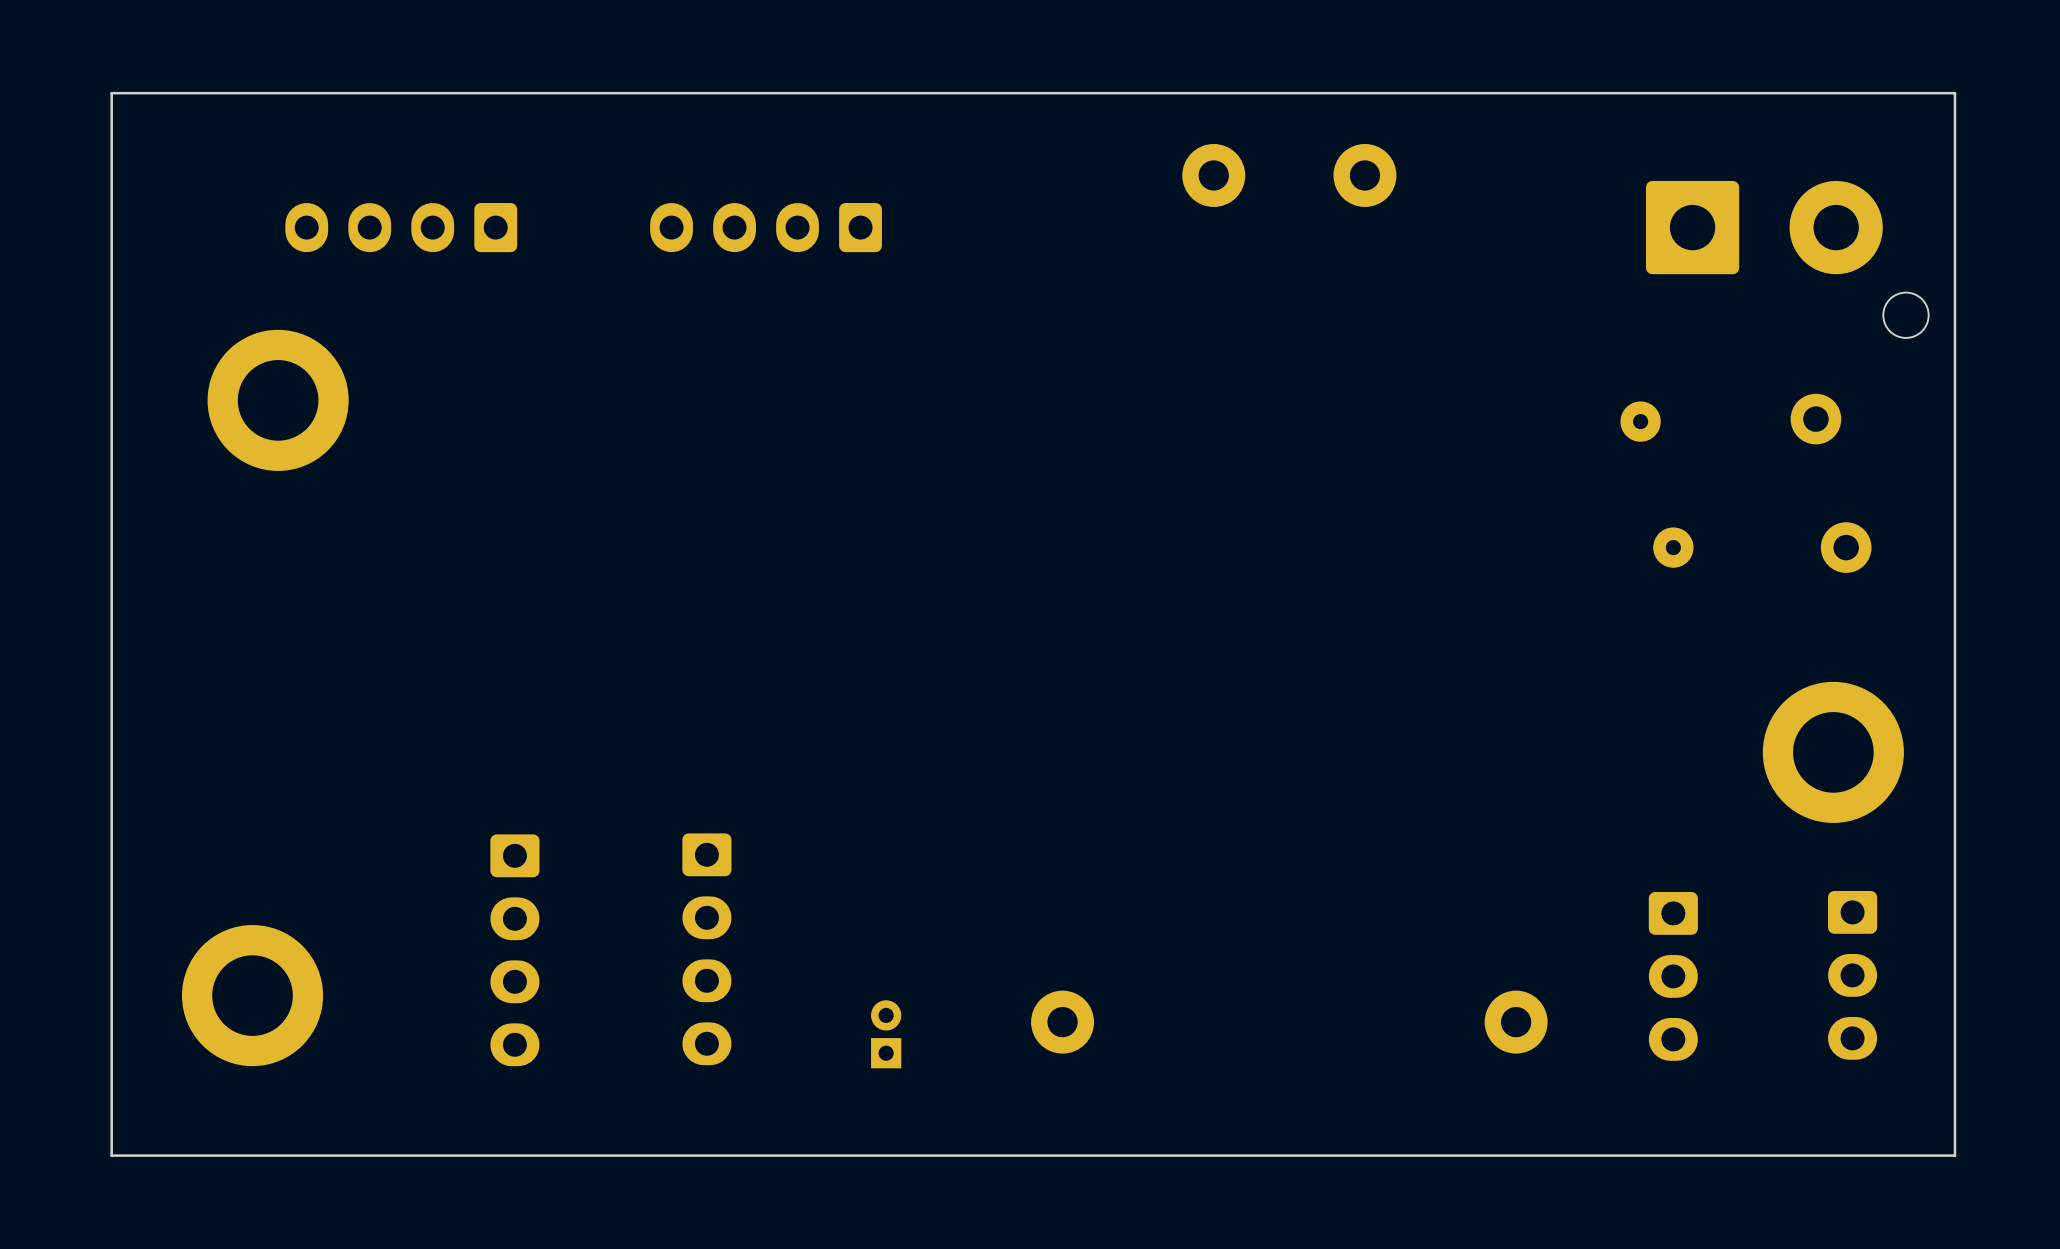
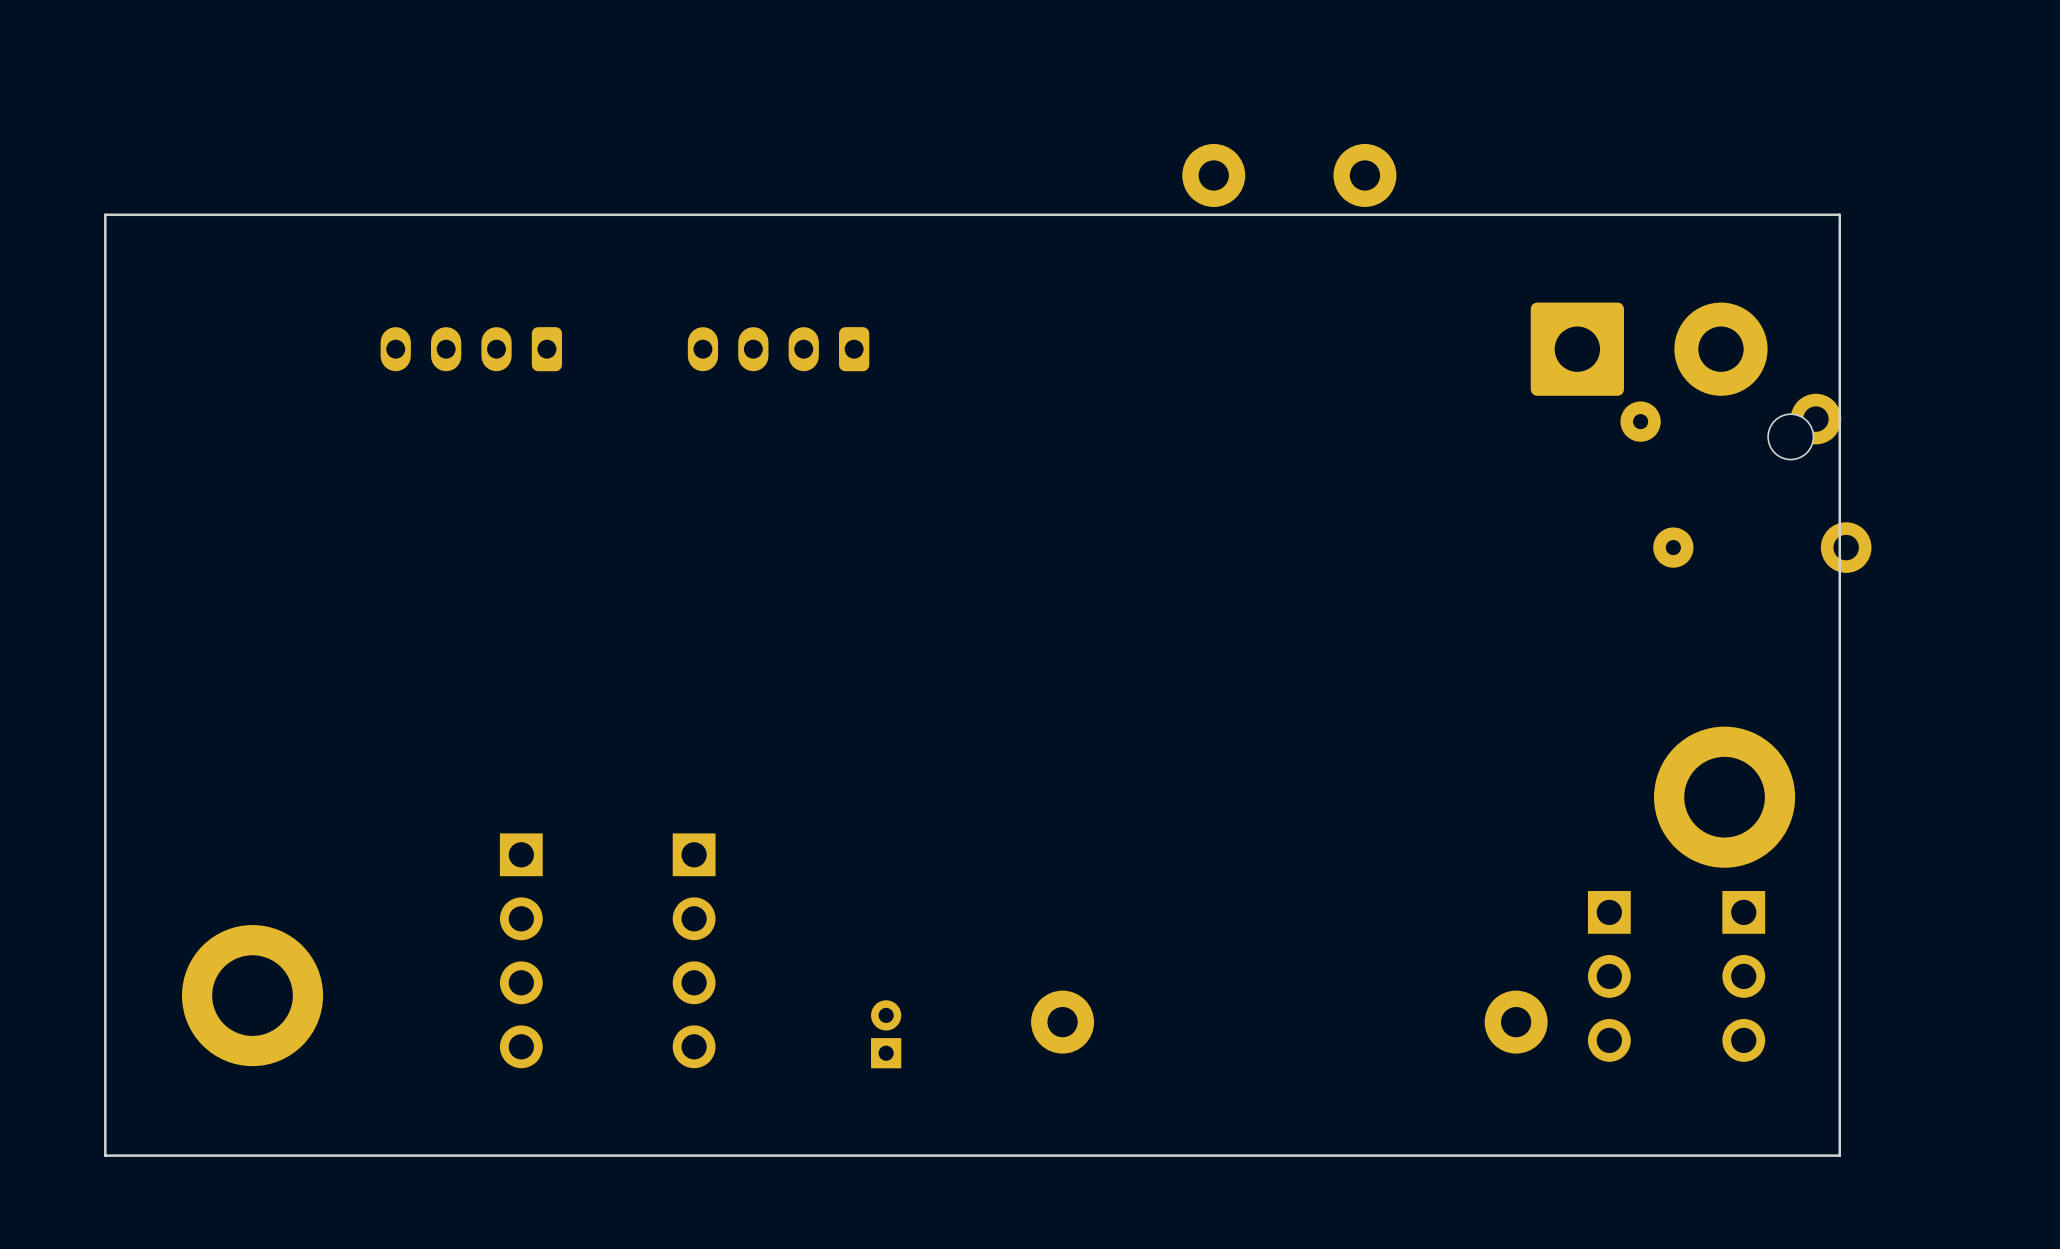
part: (401, 227) -> none
part: (766, 227) -> none
part position: (1787, 259) -> (1672, 381)
part: none -> (471, 349)
part: none -> (778, 349)
part: (278, 400) -> none
part position: (1833, 752) -> (1724, 797)
part footprint: [682, 833, 732, 1066] -> [672, 833, 716, 1069]
part footprint: [490, 834, 540, 1067] -> [499, 833, 543, 1069]
part: (1852, 975) -> none
part: none -> (1609, 976)
part: (1673, 976) -> none
part: none -> (1743, 976)
board edge: (1839, 1155) (1954, 1155) (1954, 93) (111, 93) (111, 1155) -> (1839, 1155) (1839, 214) (105, 214) (105, 1155) (111, 1155)

